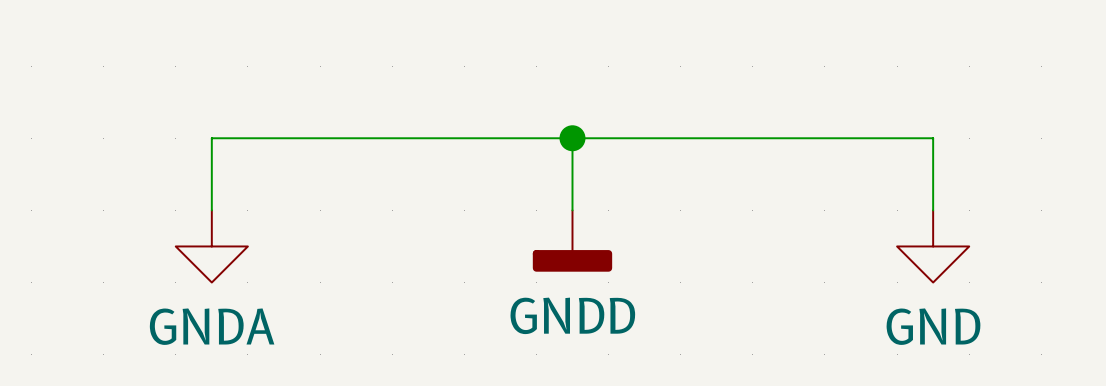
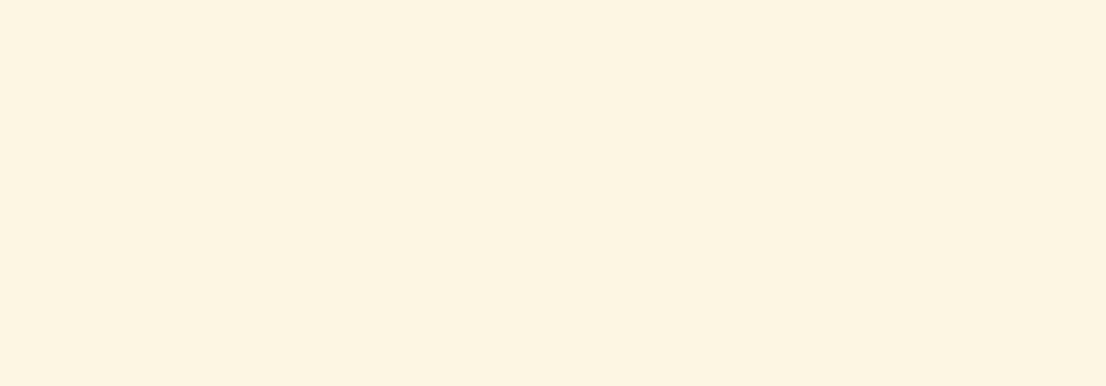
wire: (572, 138) (572, 210) -> none
junction: (572, 138) -> none
wire: (211, 210) (211, 138) (933, 138) (933, 210) -> none
power symbol: GNDD (572, 241) -> none
power symbol: GNDA (211, 246) -> none
power symbol: GND (933, 246) -> none

